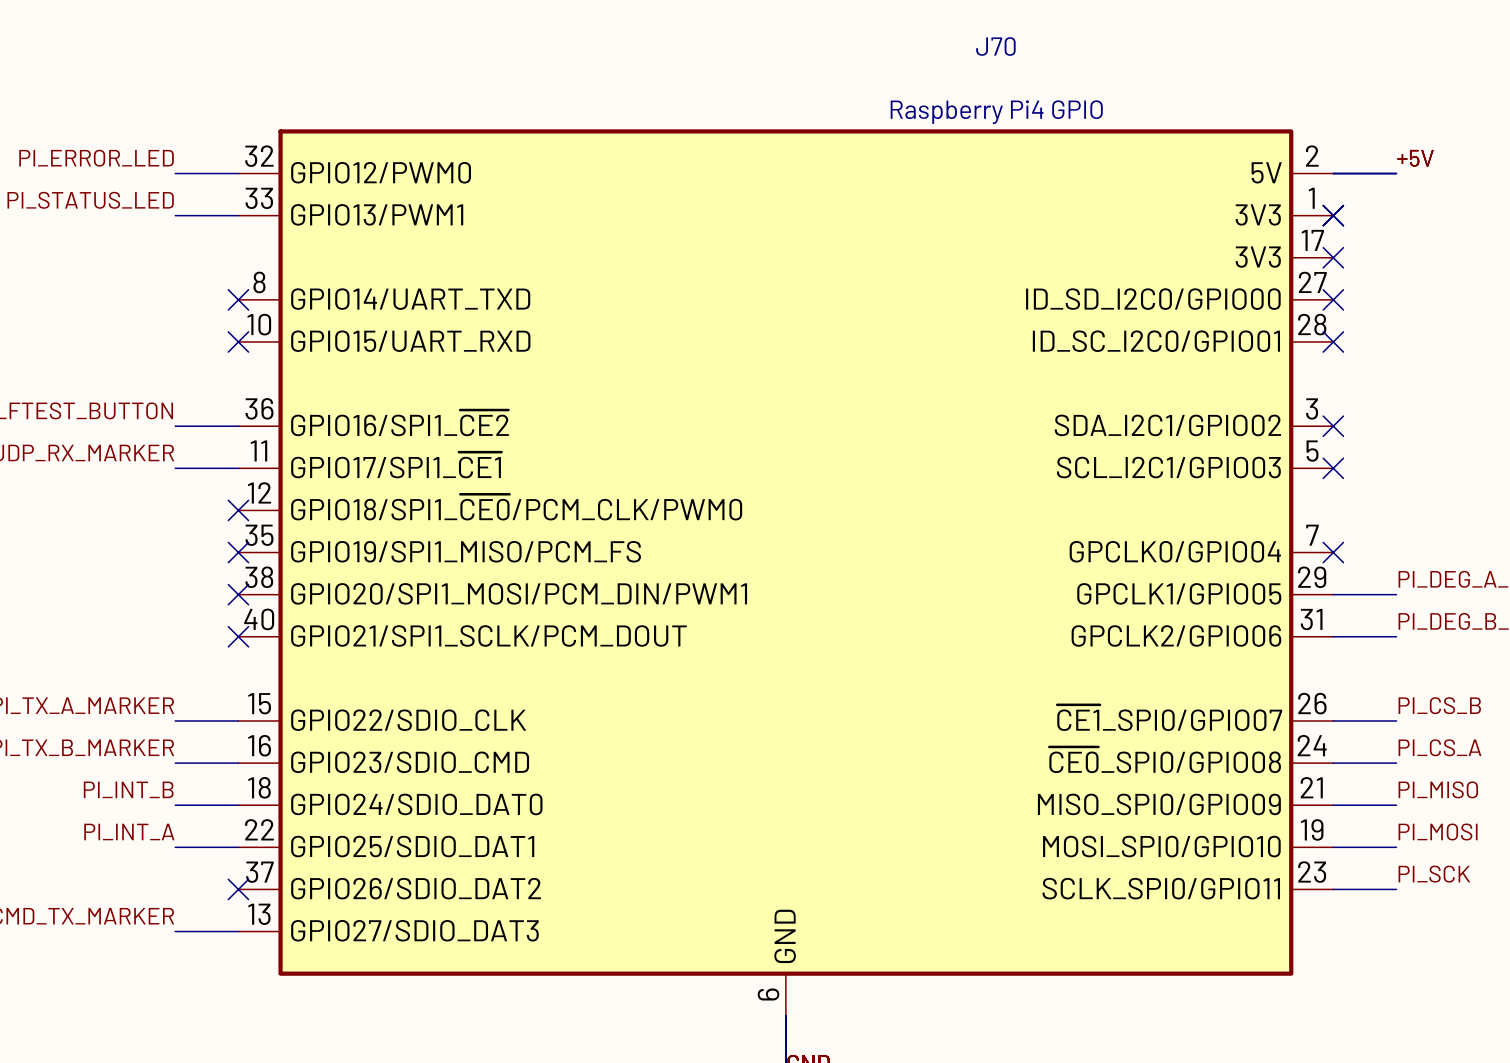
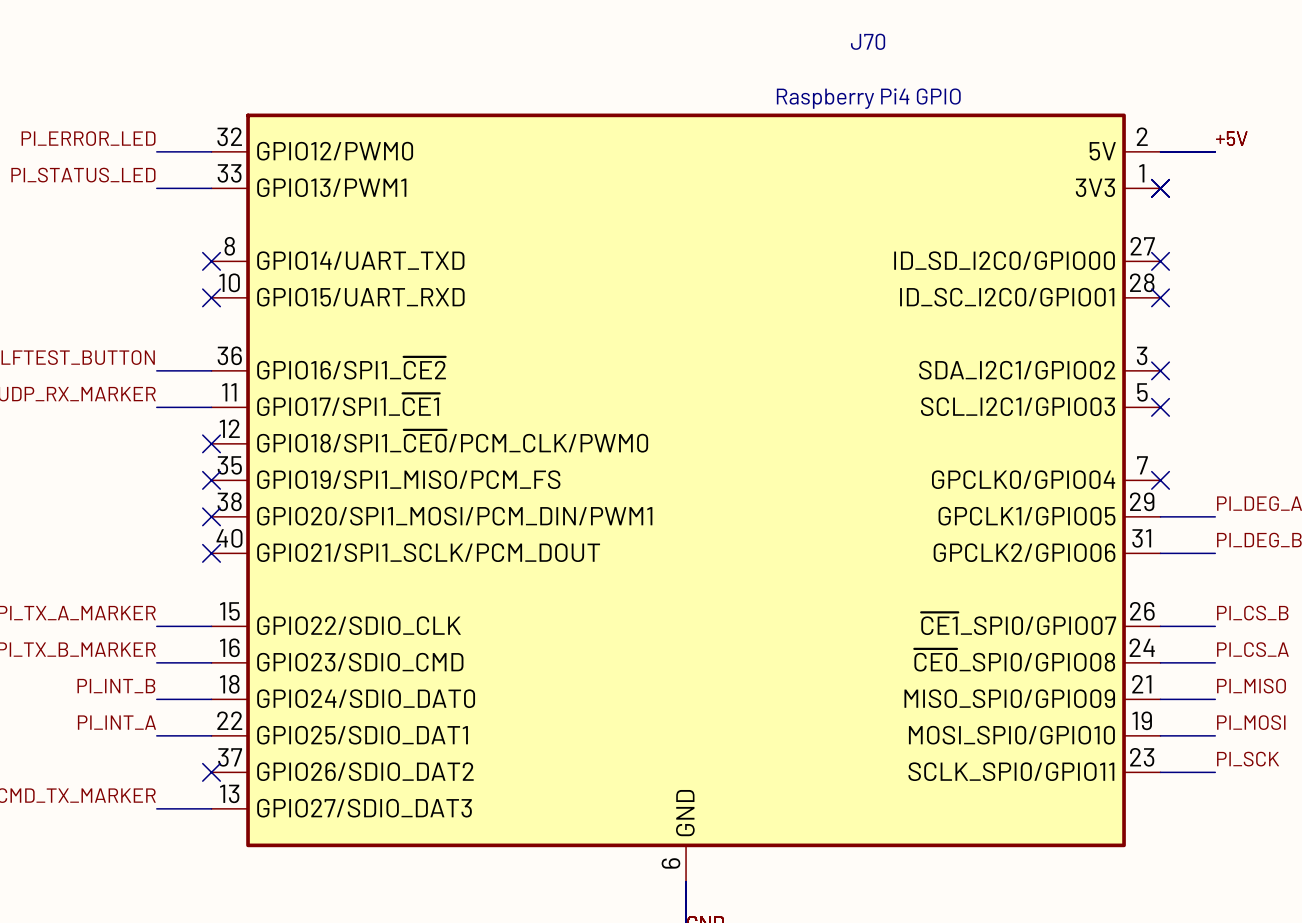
J70 symbol: [238, 129, 1334, 1016] -> [211, 113, 1161, 882]
no-connect mark: (1333, 257) -> none

